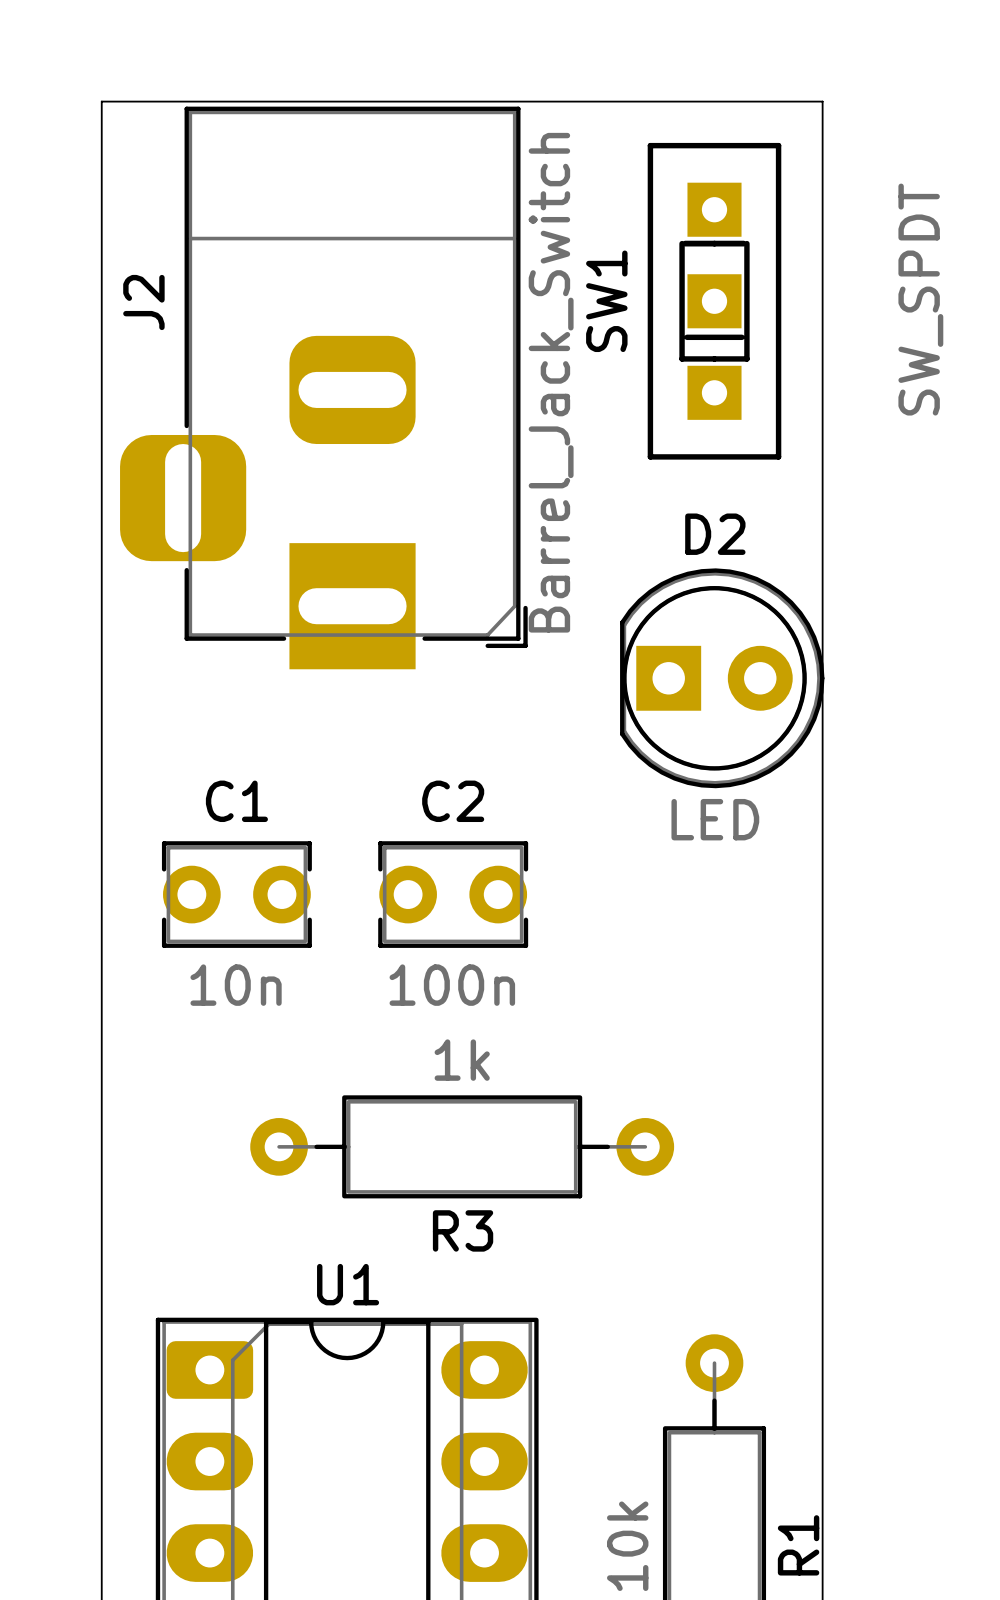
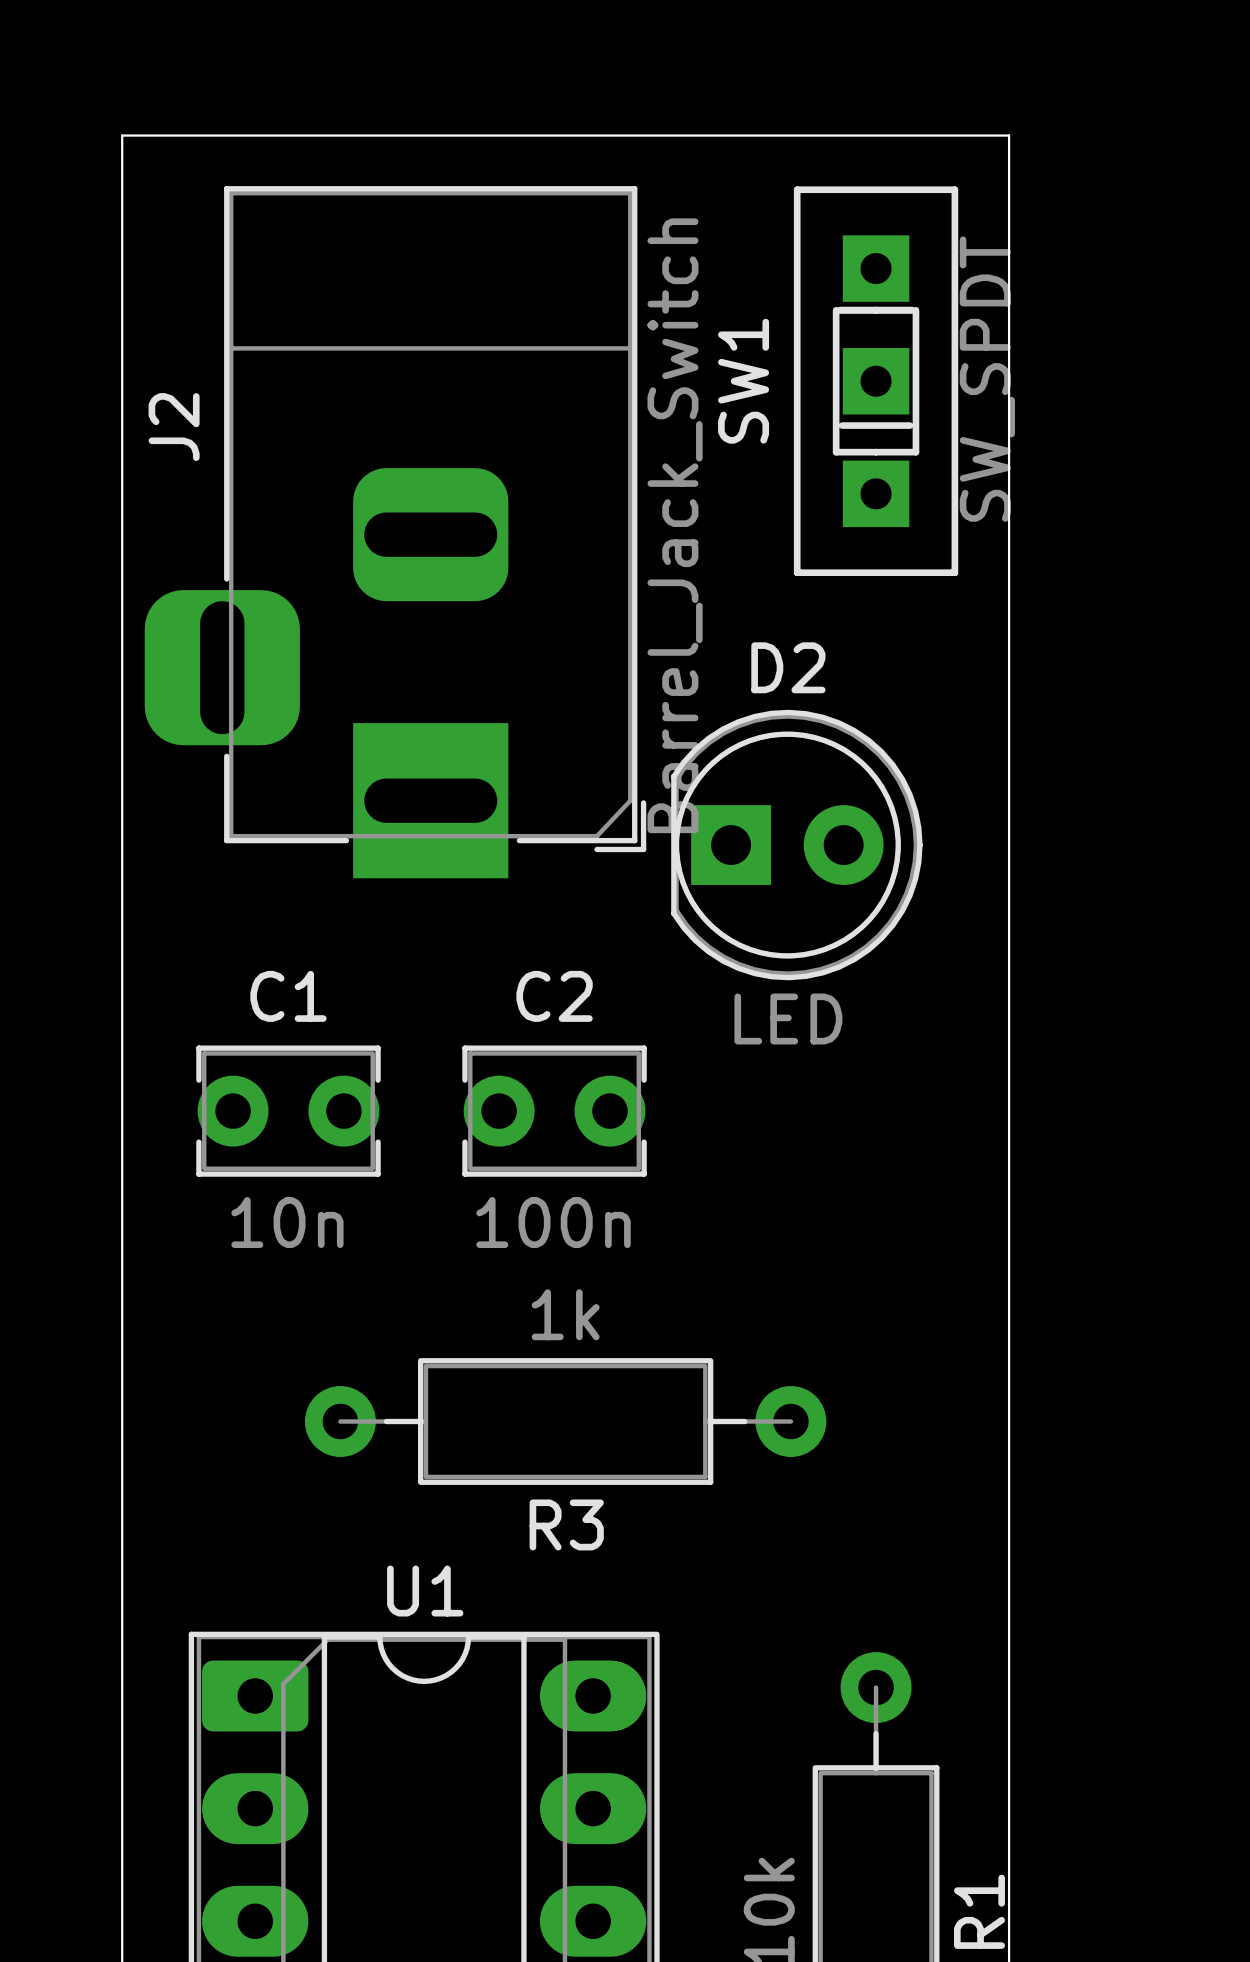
SW1 value position: SW_SPDT (920, 299) -> SW_SPDT (987, 379)
J2 position: (323, 387) -> (395, 532)
D2 position: (722, 678) -> (796, 845)

